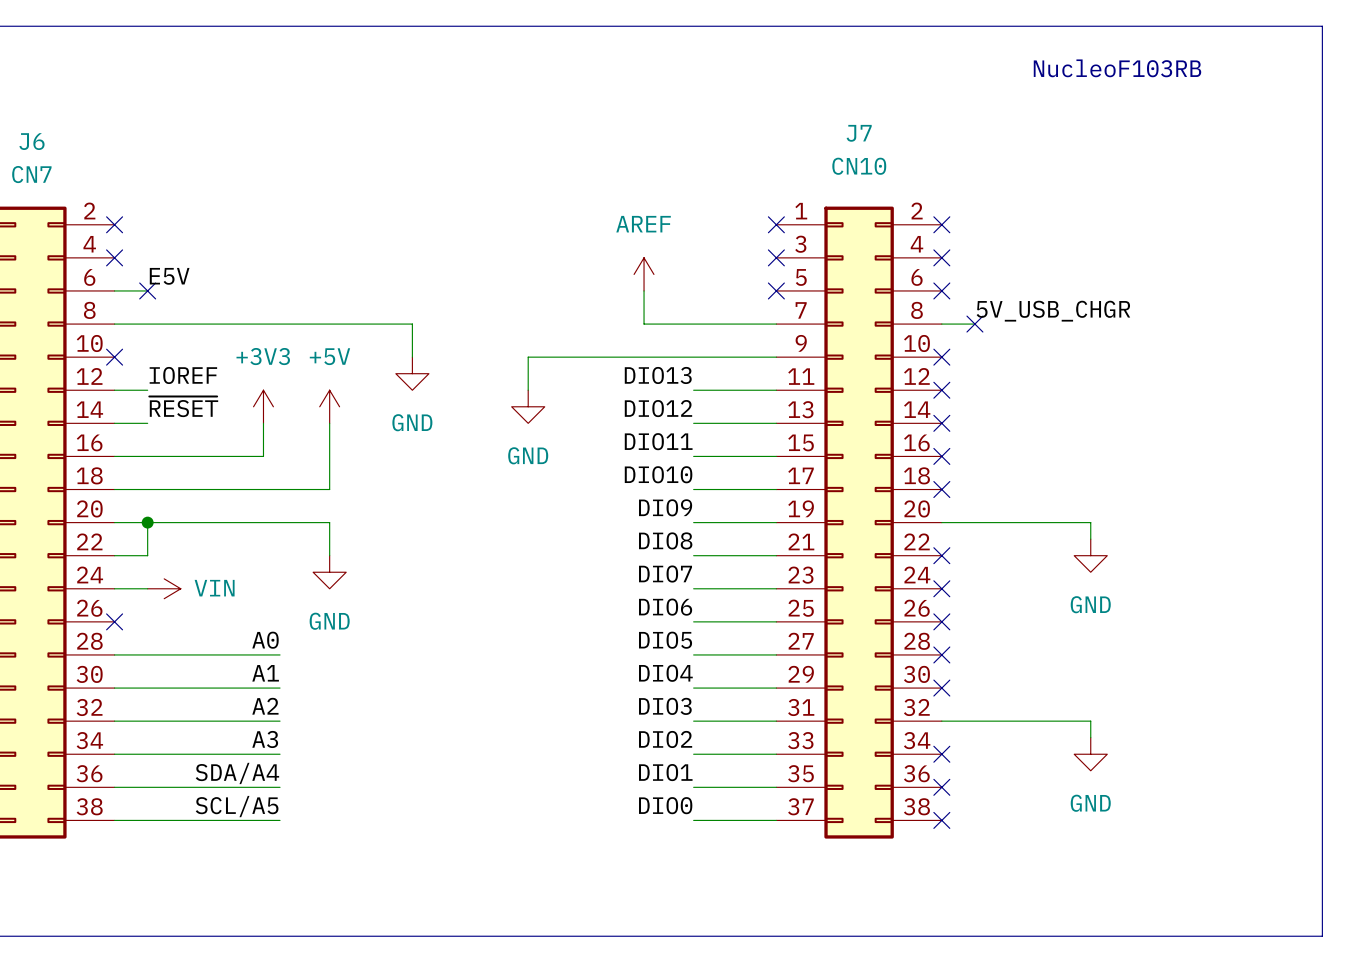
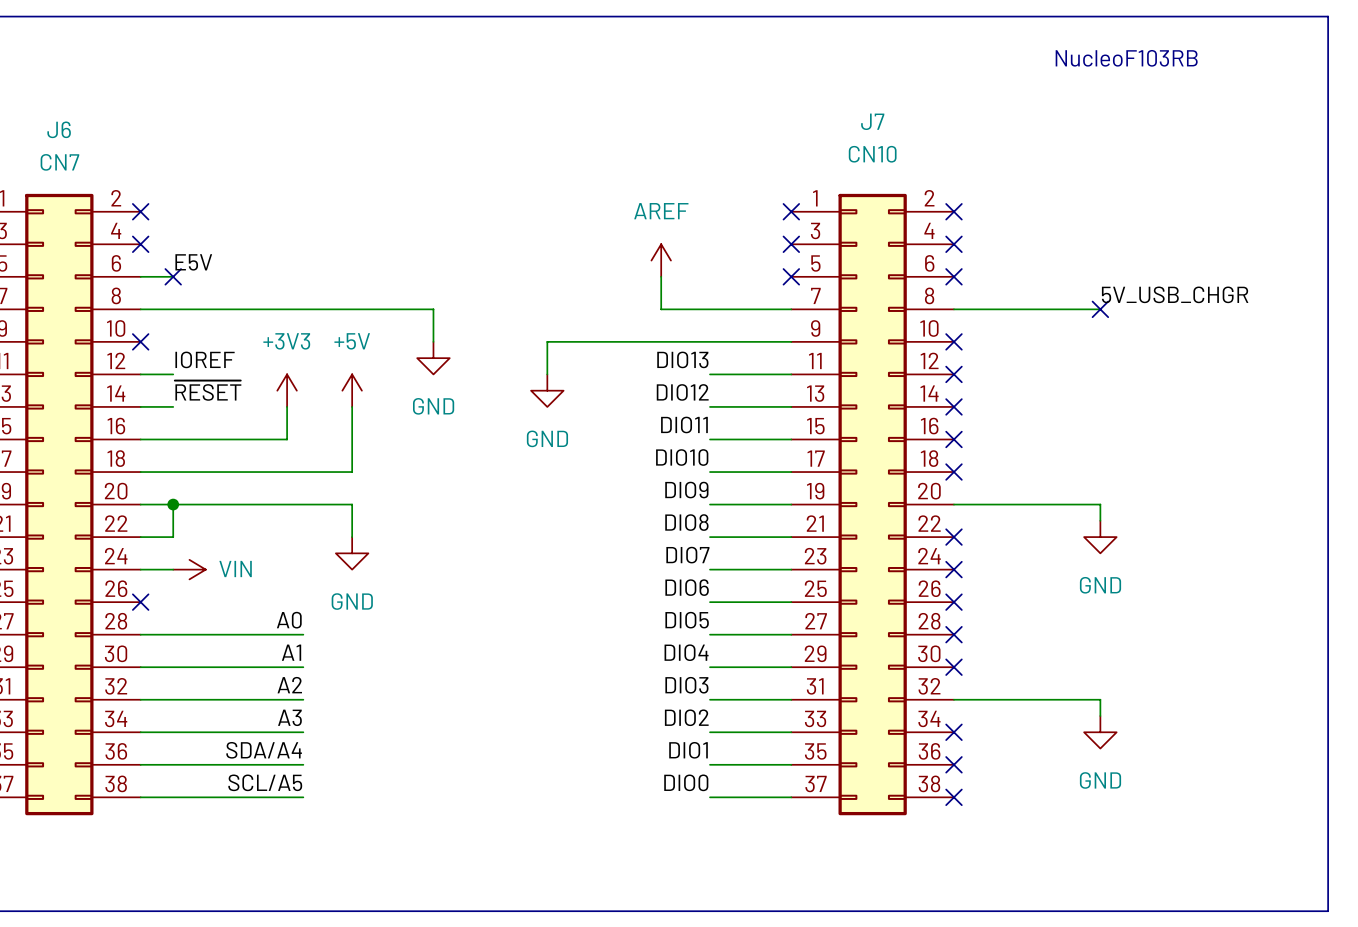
label position: 5V_USB_CHGR (1053, 311) -> 5V_USB_CHGR (1175, 294)
wire: none -> (986, 309) (1100, 309)
no-connect mark: (974, 324) -> none
no-connect mark: none -> (1100, 309)

